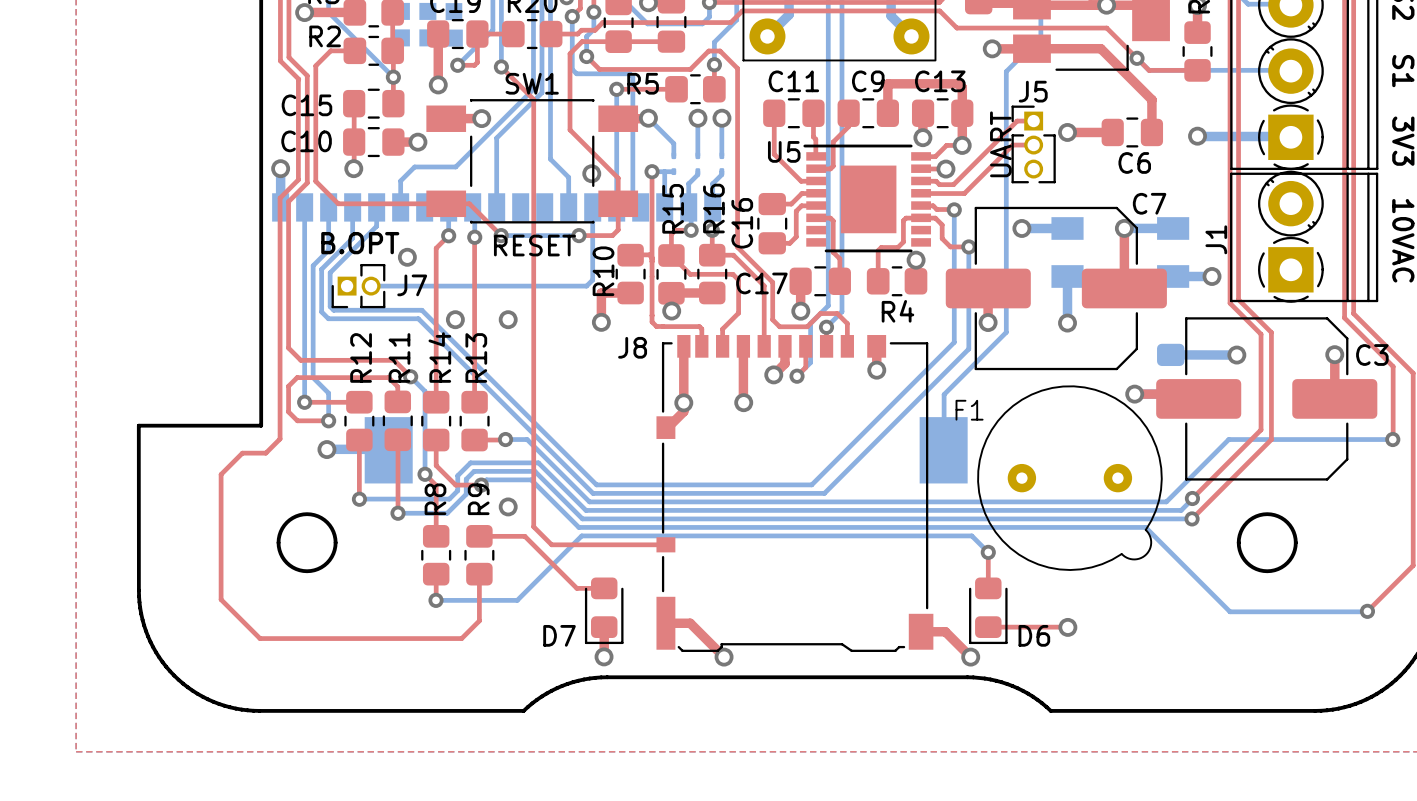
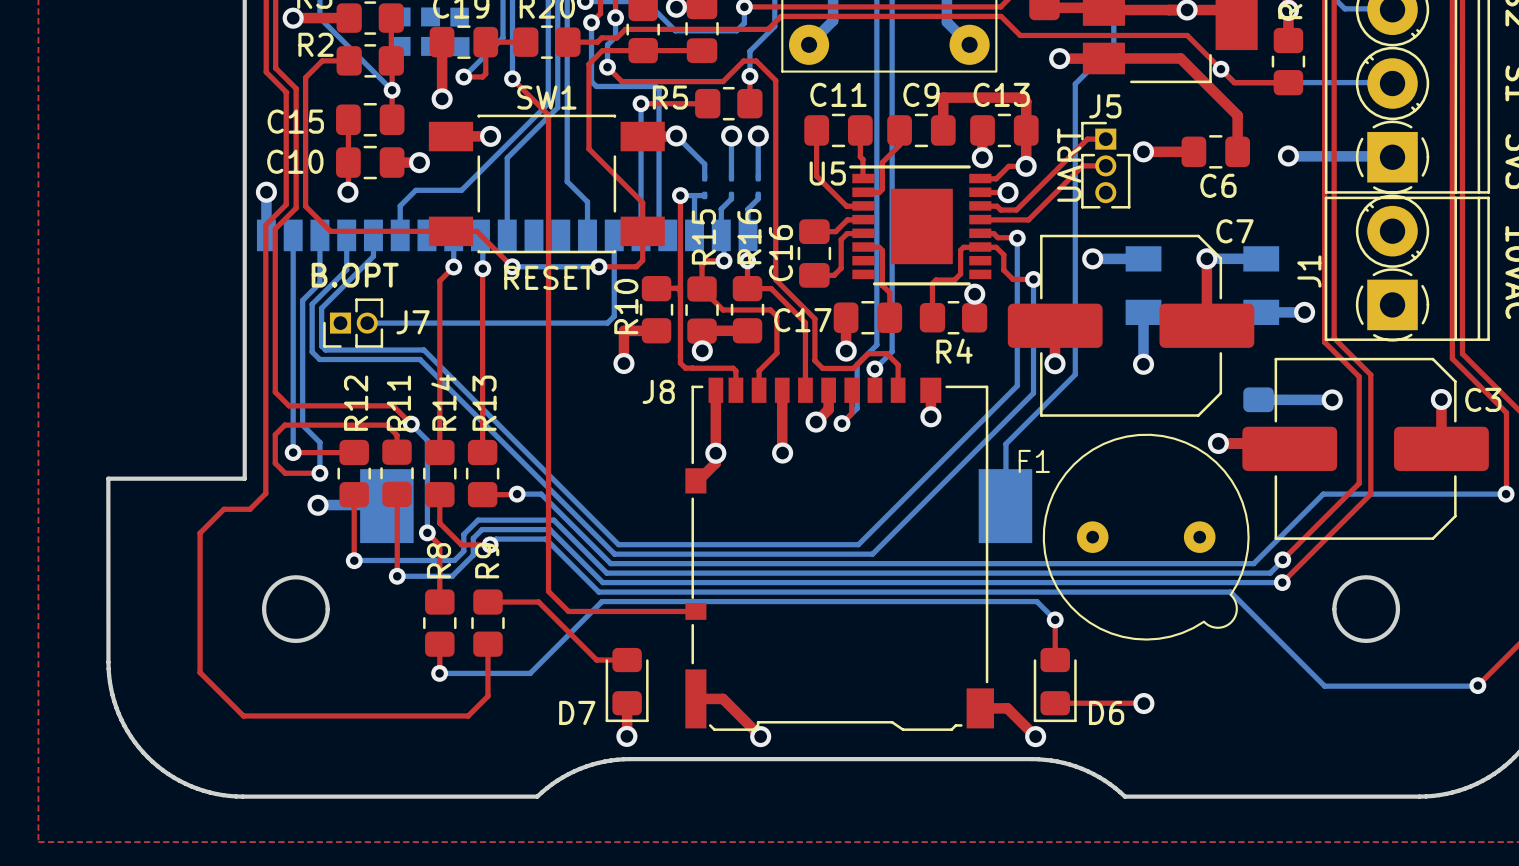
via: (591, 173) -> none
via: (407, 257) -> none
via: (455, 319) -> none
via: (508, 319) -> none
via: (508, 506) -> none

